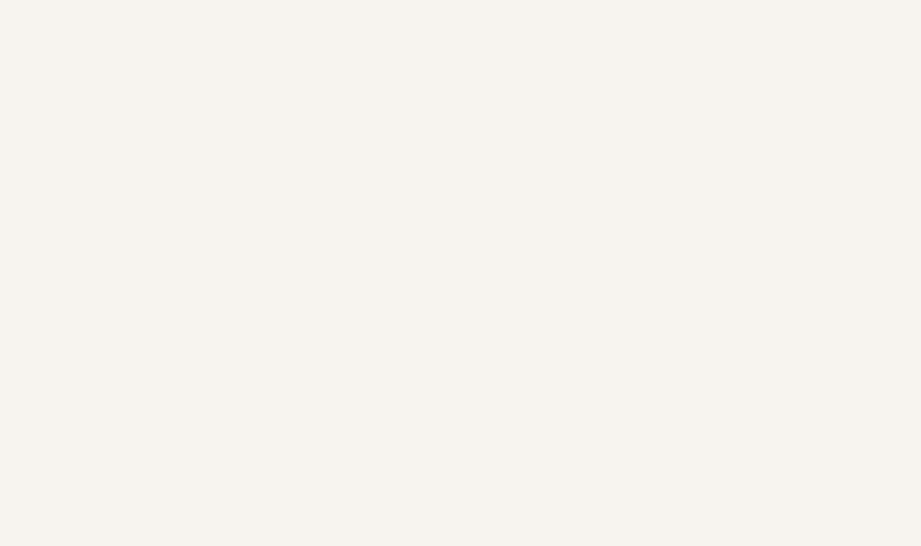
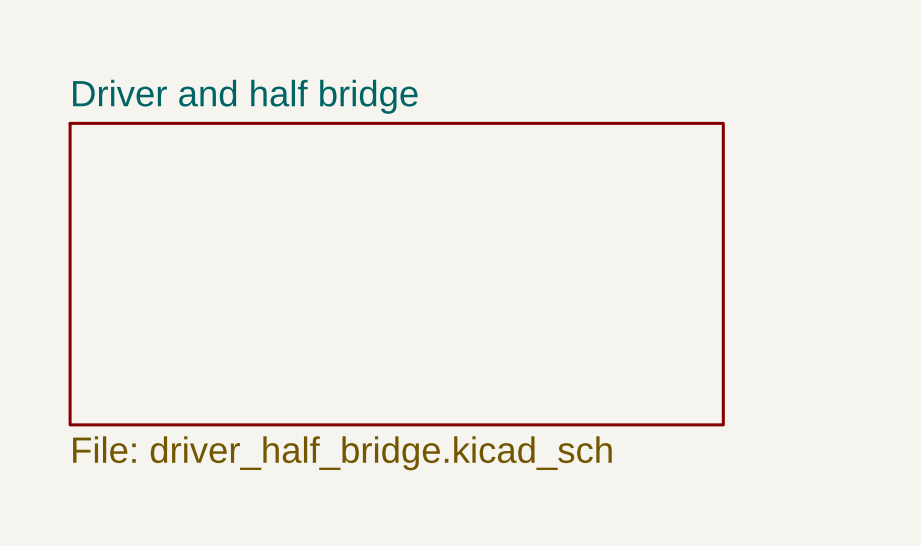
sheet Driver and half bridge: none -> File: driver_half_bridge.kicad_sch (396, 274)

